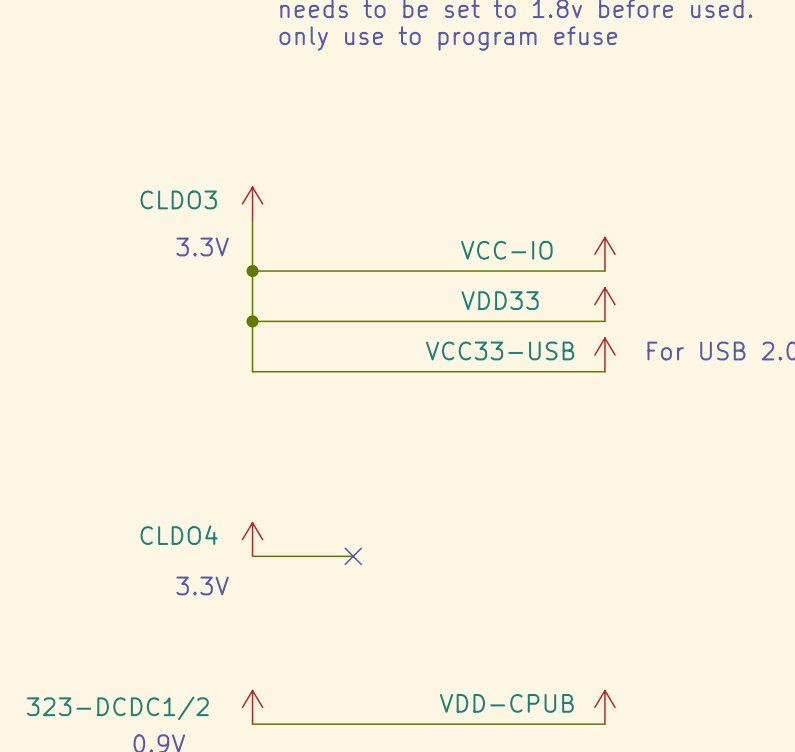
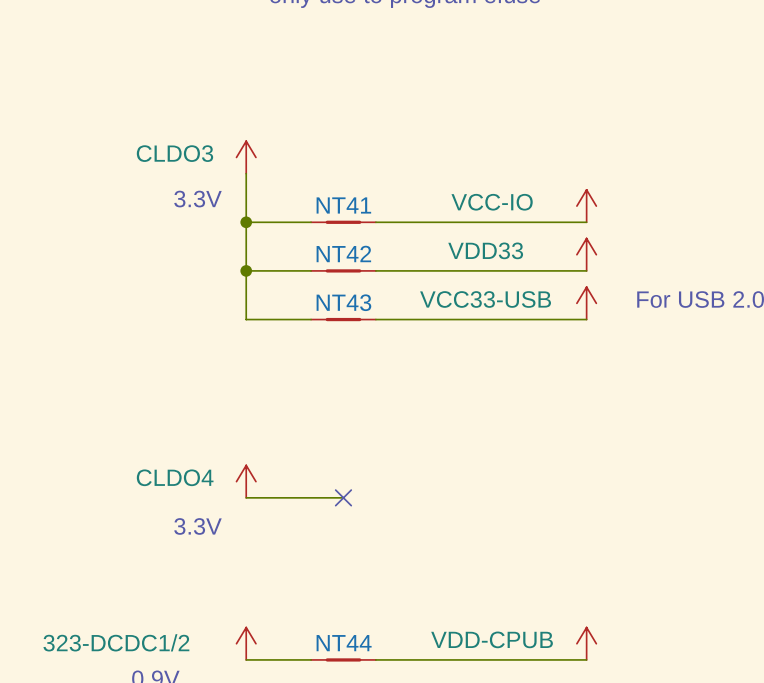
NT41: none -> (343, 222)
NT42: none -> (343, 270)
NT43: none -> (343, 319)
NT44: none -> (343, 659)

